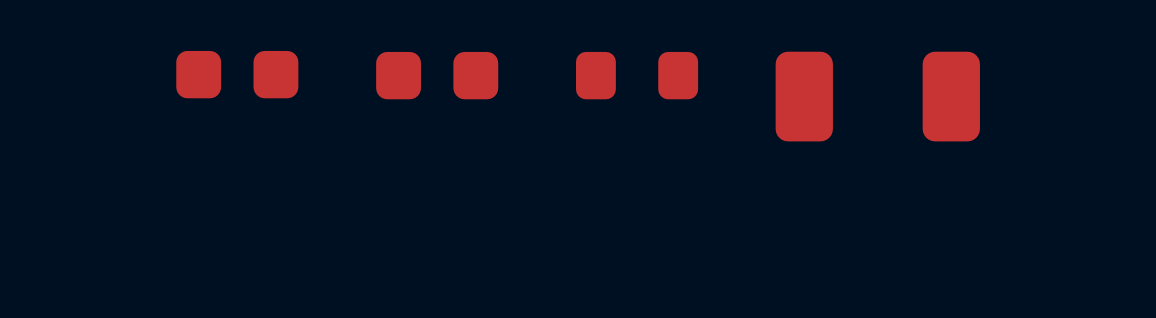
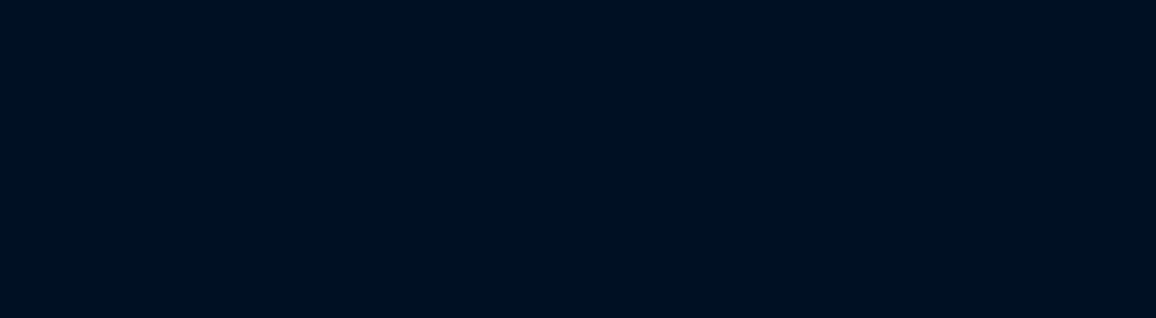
part: (237, 74) -> none
part: (437, 75) -> none
part: (637, 75) -> none
part: (877, 96) -> none

